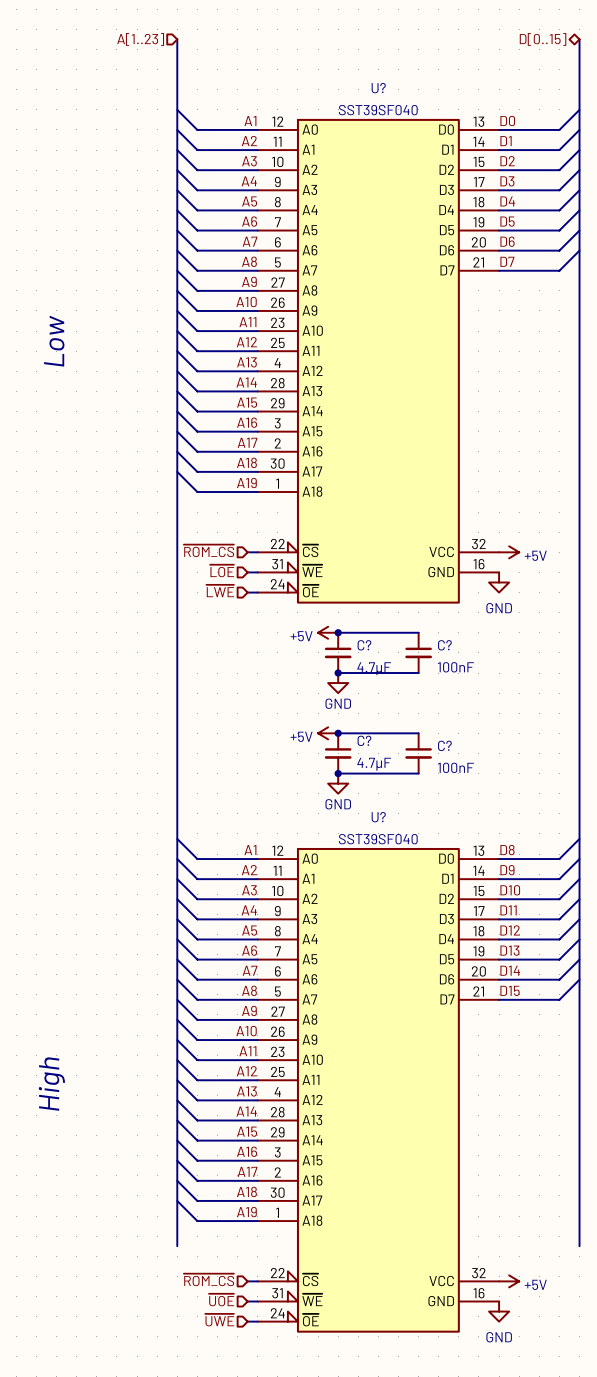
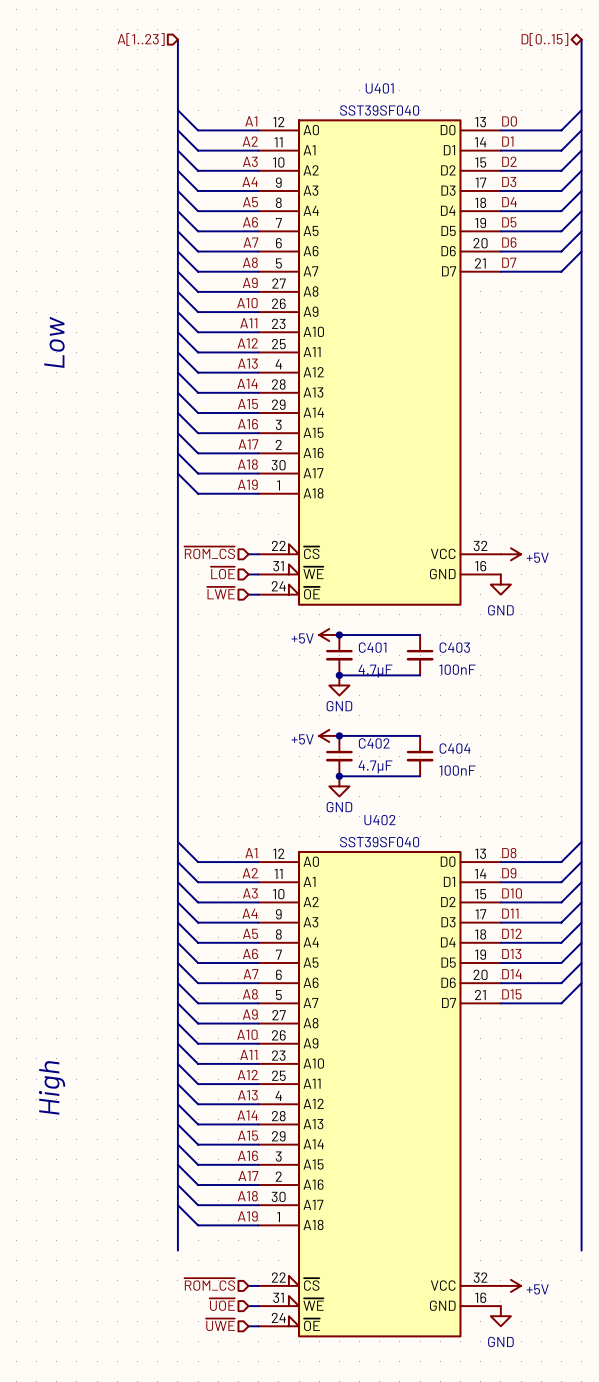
U? name: U? (378, 88) -> U401 (379, 88)
C? name: C? (364, 645) -> C401 (372, 647)
C? name: C? (444, 645) -> C403 (454, 647)
C? name: C? (364, 740) -> C402 (374, 743)
C? name: C? (444, 745) -> C404 (455, 748)
U? name: U? (378, 817) -> U402 (379, 820)

